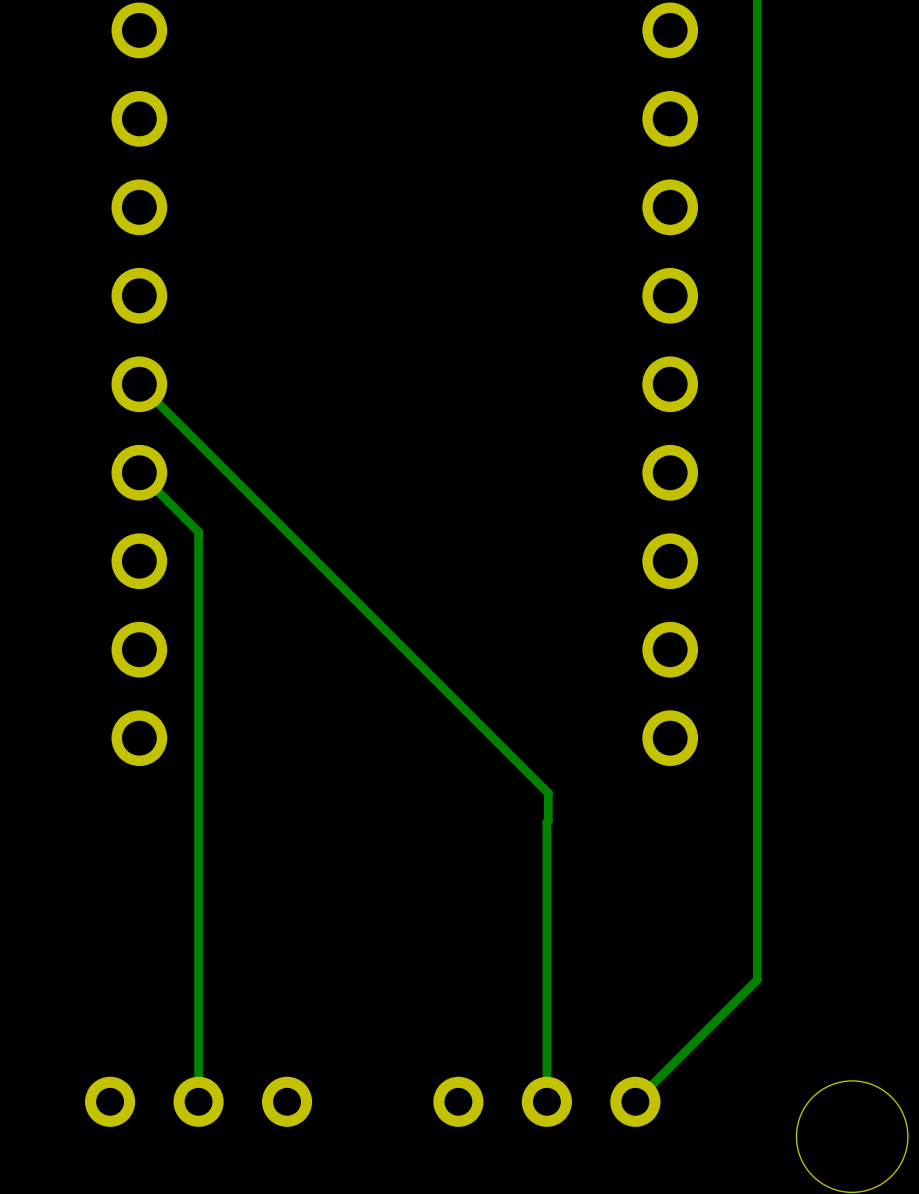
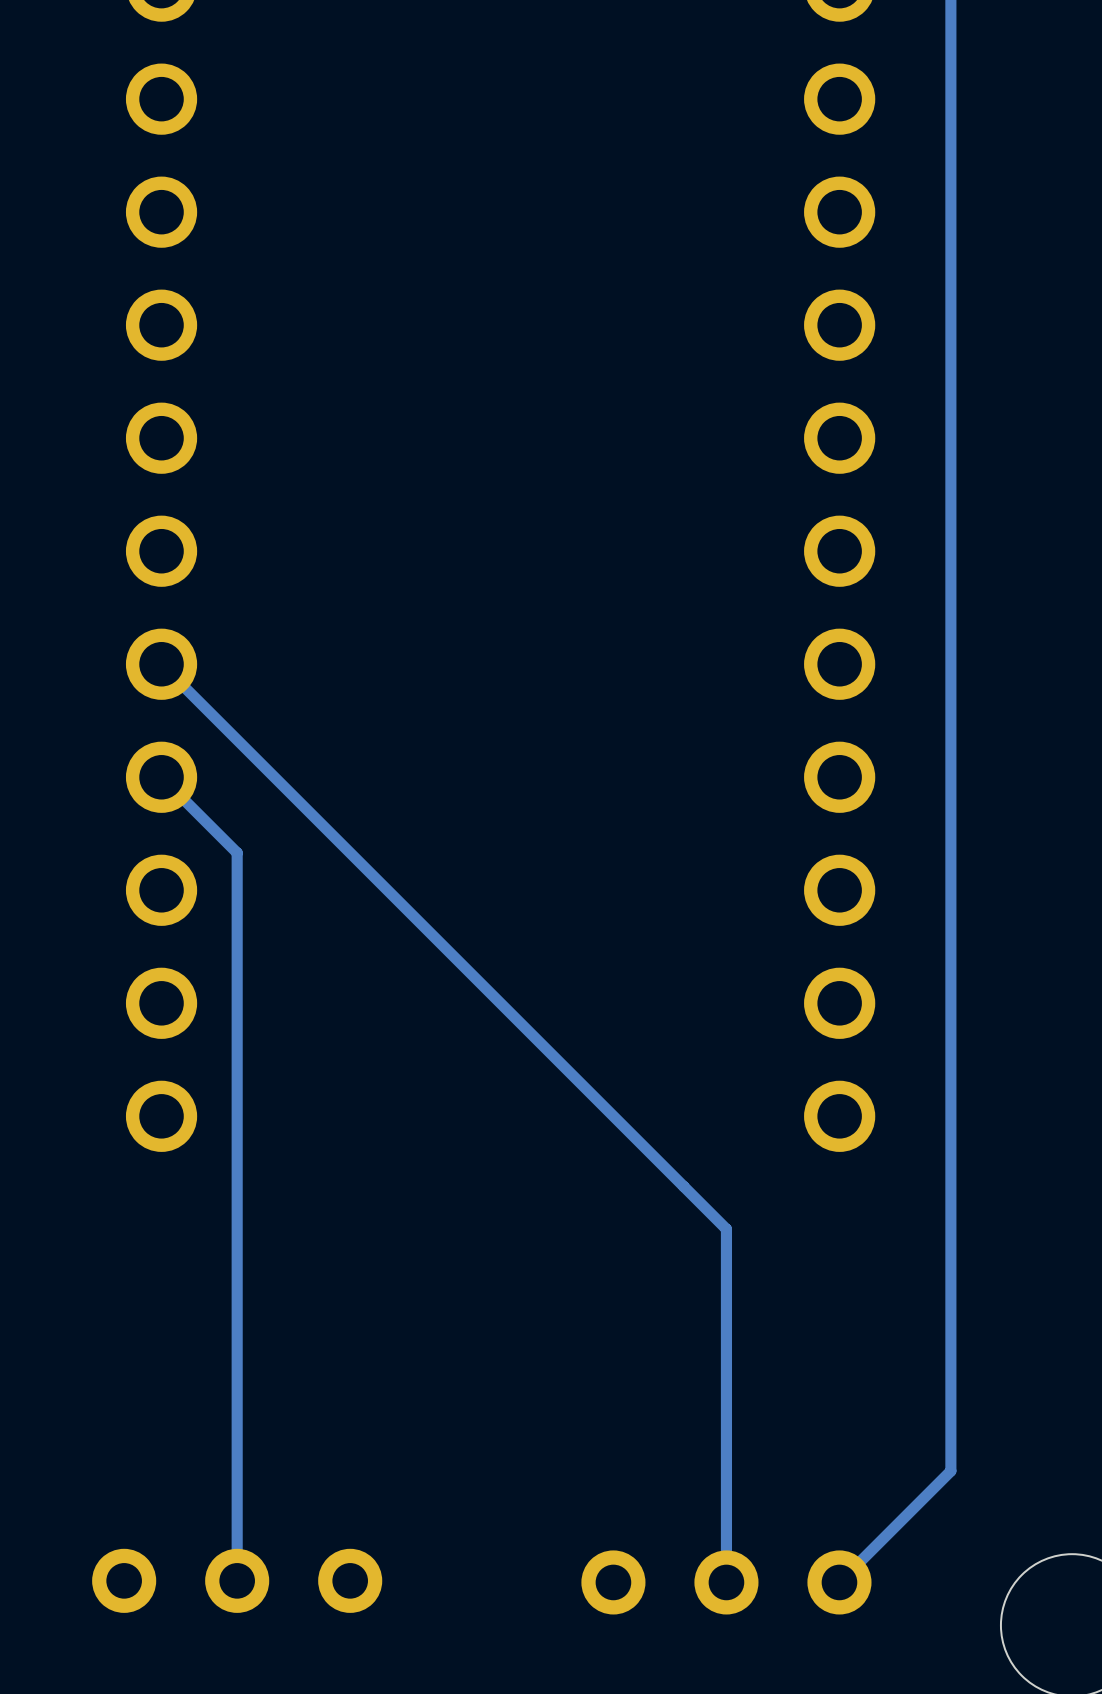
track: (548, 793) (546, 1101) -> (683, 1186) (726, 1229) (726, 1582)
track: (757, 979) (635, 1101) -> (950, 1425) (950, 1471) (839, 1582)
part position: (546, 1101) -> (726, 1582)

